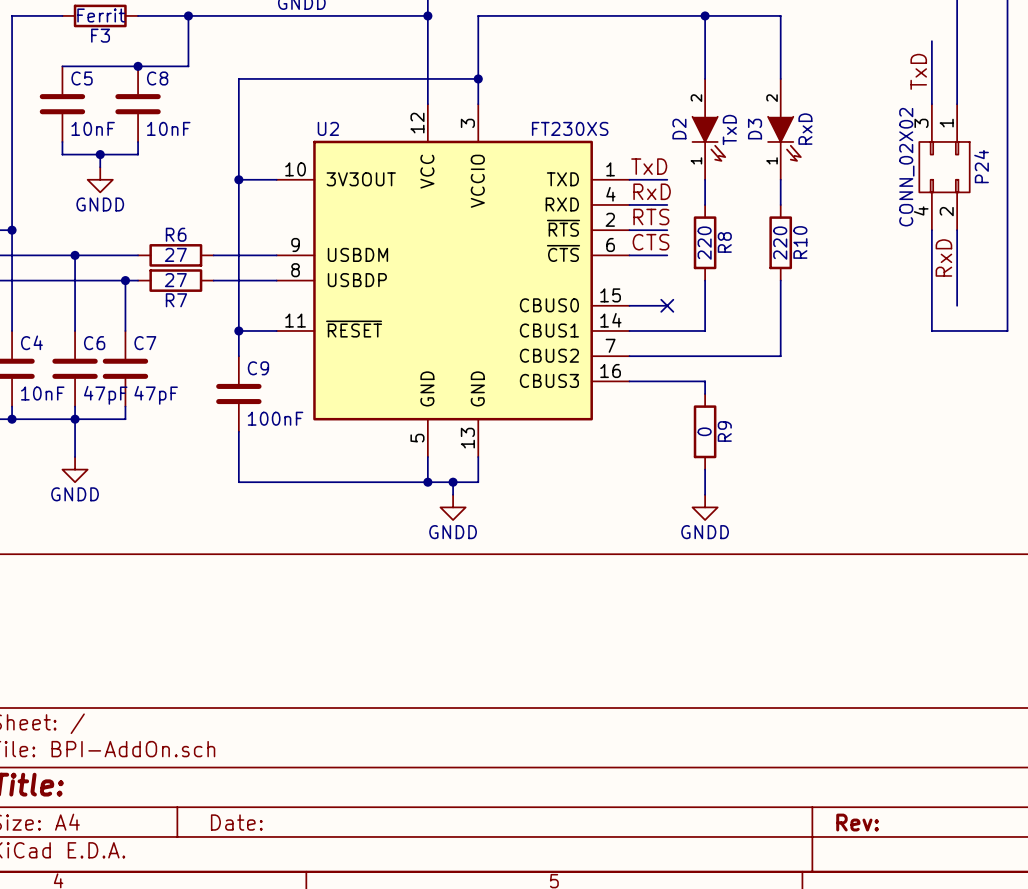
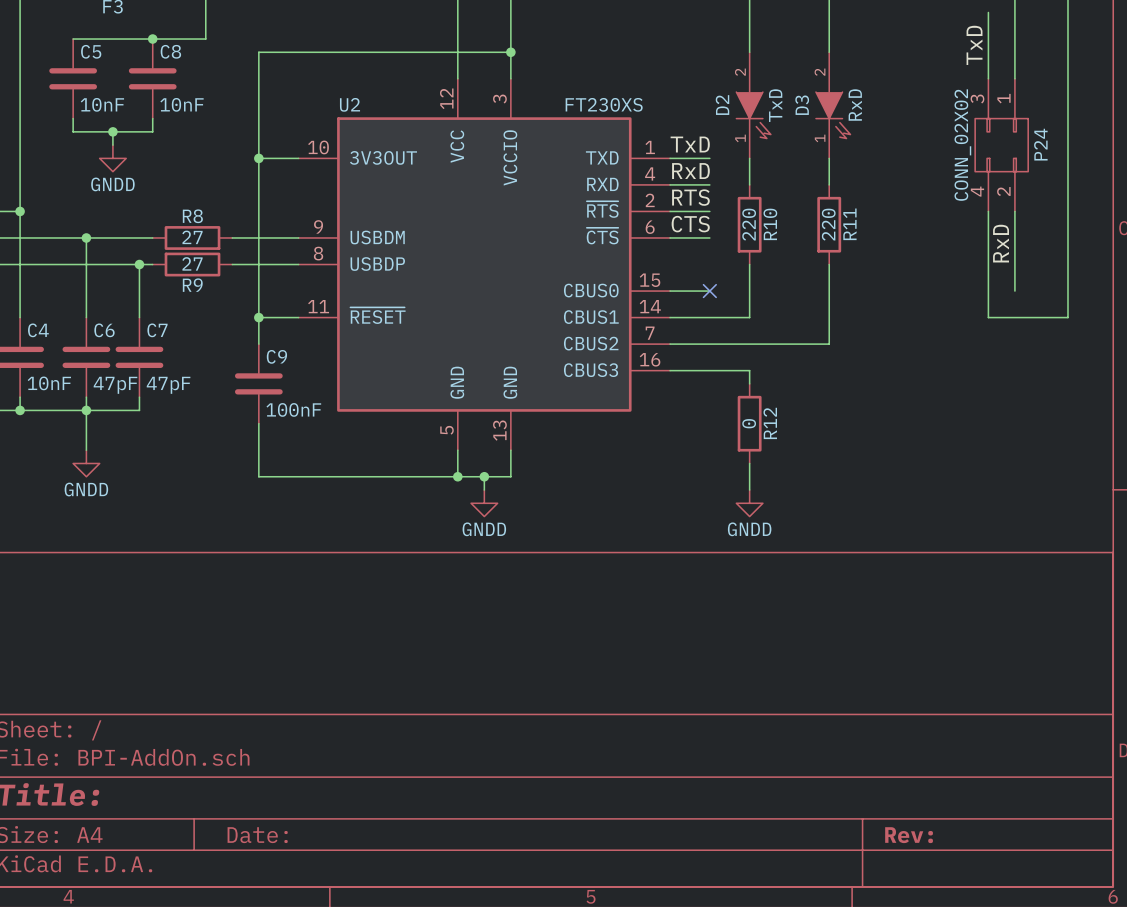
R6 name: R6 (176, 234) -> R8 (192, 216)
R8 name: R8 (724, 242) -> R10 (770, 224)
R10 name: R10 (800, 242) -> R11 (849, 224)
R7 name: R7 (176, 300) -> R9 (192, 285)
R9 name: R9 (724, 431) -> R12 (770, 423)

